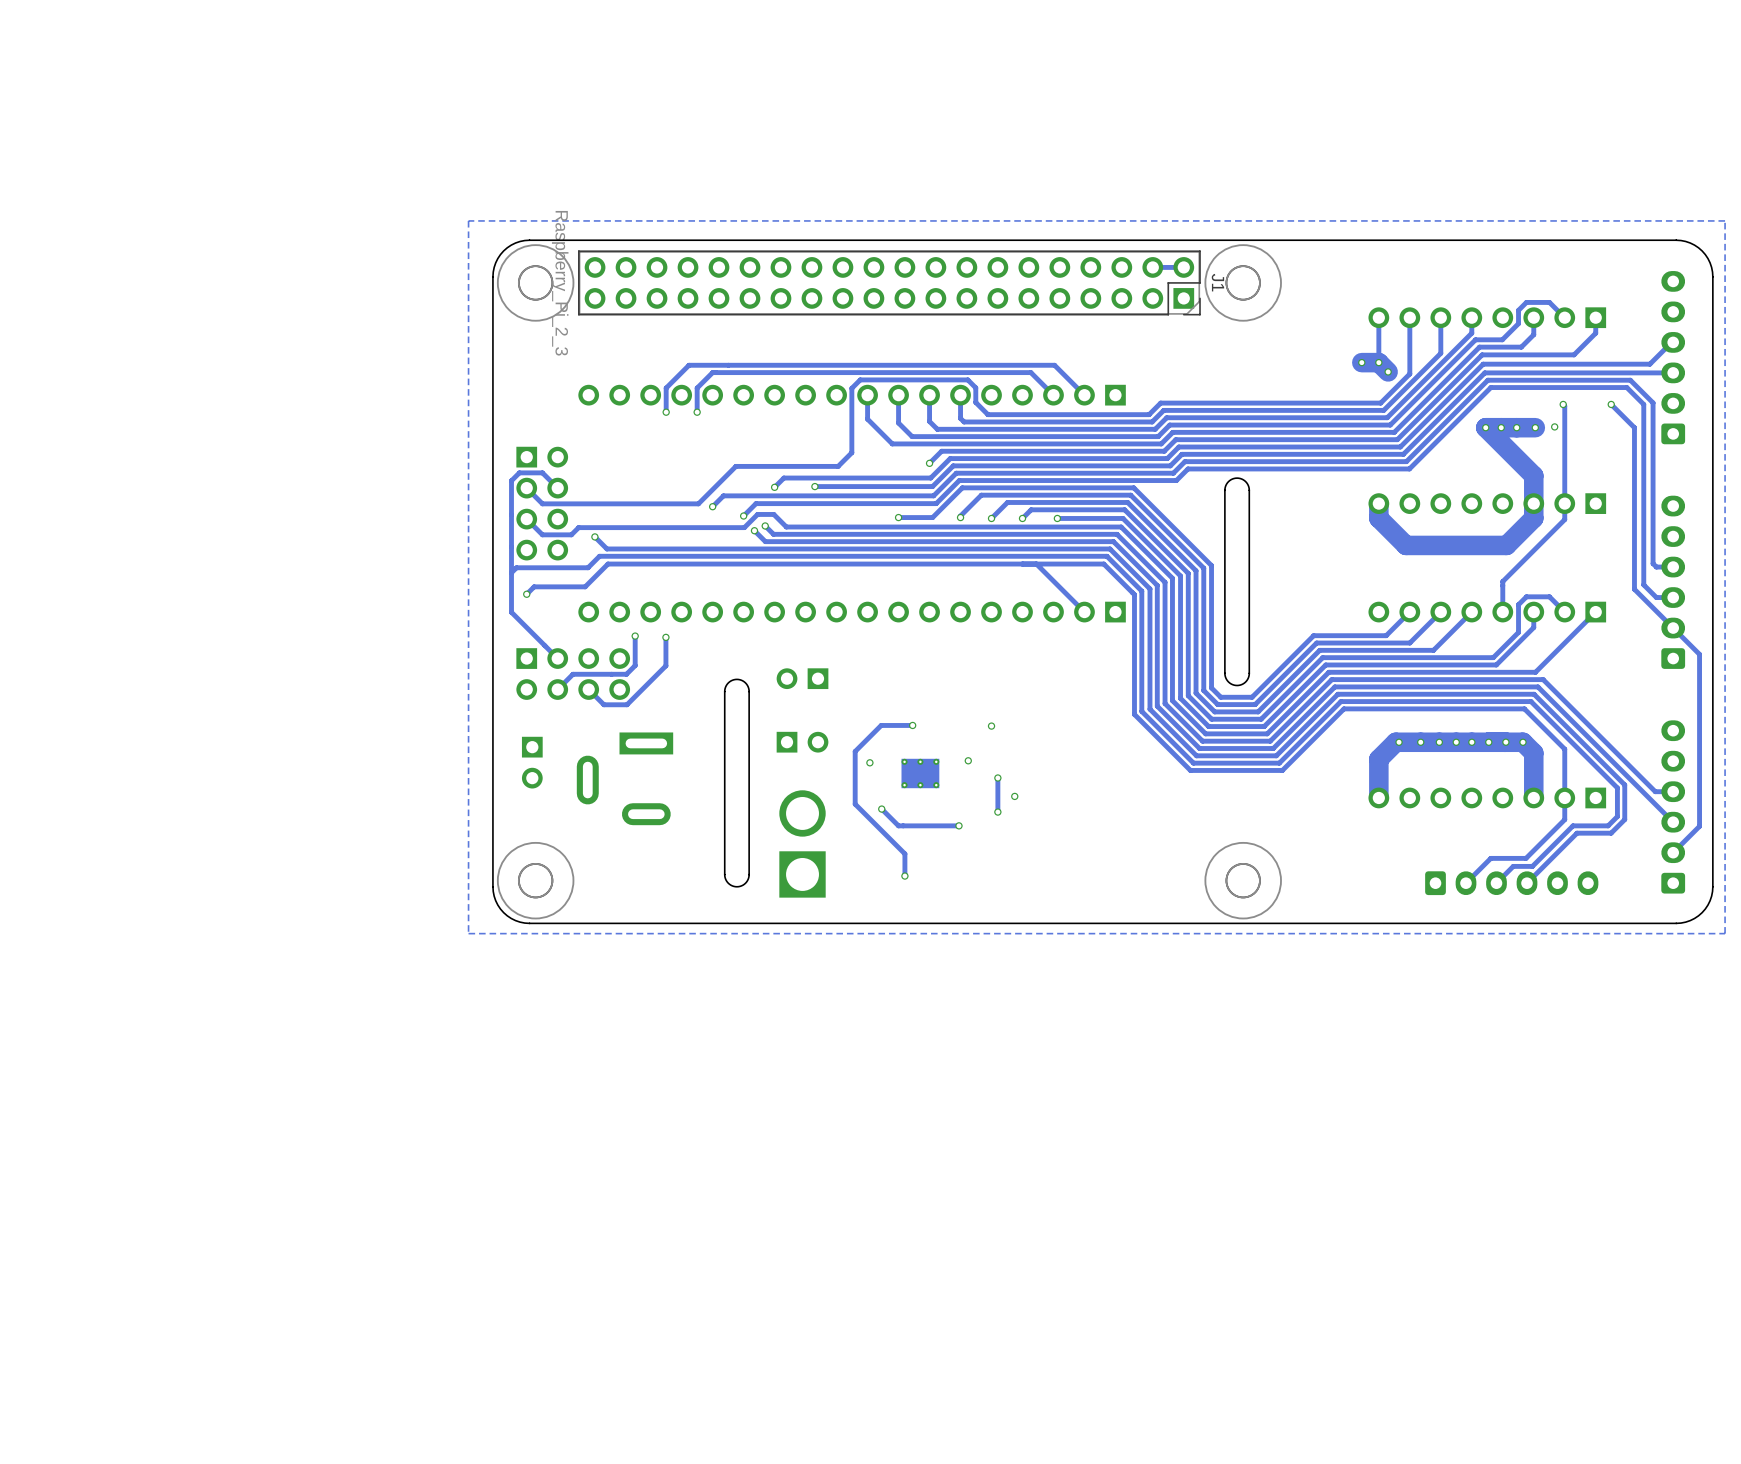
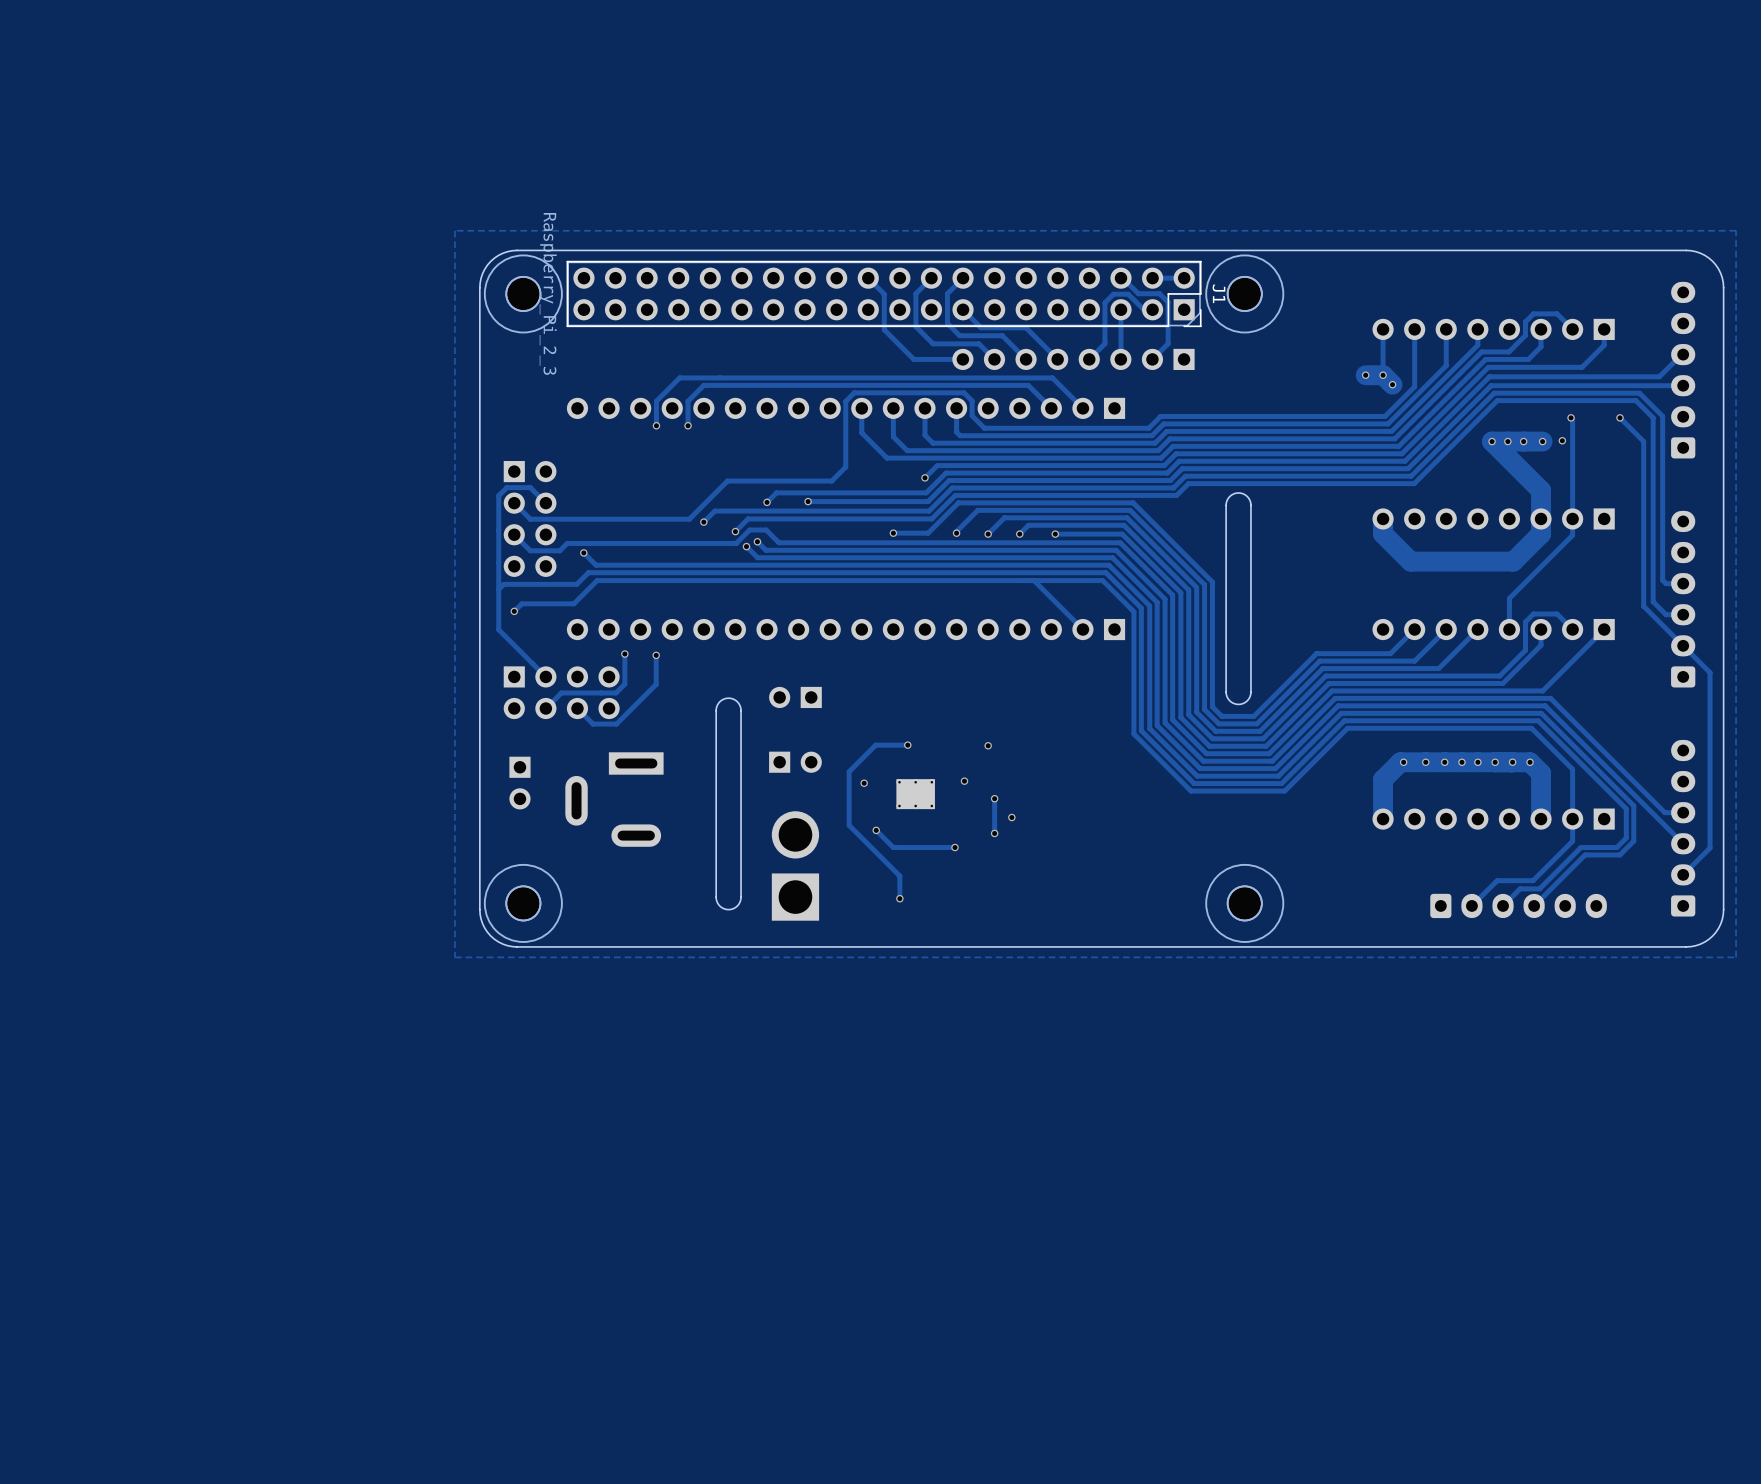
track: none -> (868, 278) (884, 294) (884, 329) (913, 359) (962, 359)
track: none -> (931, 278) (915, 293) (915, 326) (933, 343) (978, 343) (994, 359)
track: none -> (963, 278) (947, 293) (947, 323) (959, 335) (1002, 335) (1026, 359)
track: none -> (1121, 278) (1138, 293) (1159, 293) (1168, 302) (1168, 343) (1152, 359)
track: none -> (963, 309) (981, 327) (1026, 327) (1057, 359)
track: none -> (1121, 309) (1121, 359)
track: none -> (1152, 309) (1143, 309) (1128, 294) (1113, 294) (1104, 302) (1104, 343) (1089, 359)
part: none -> (1073, 359)

